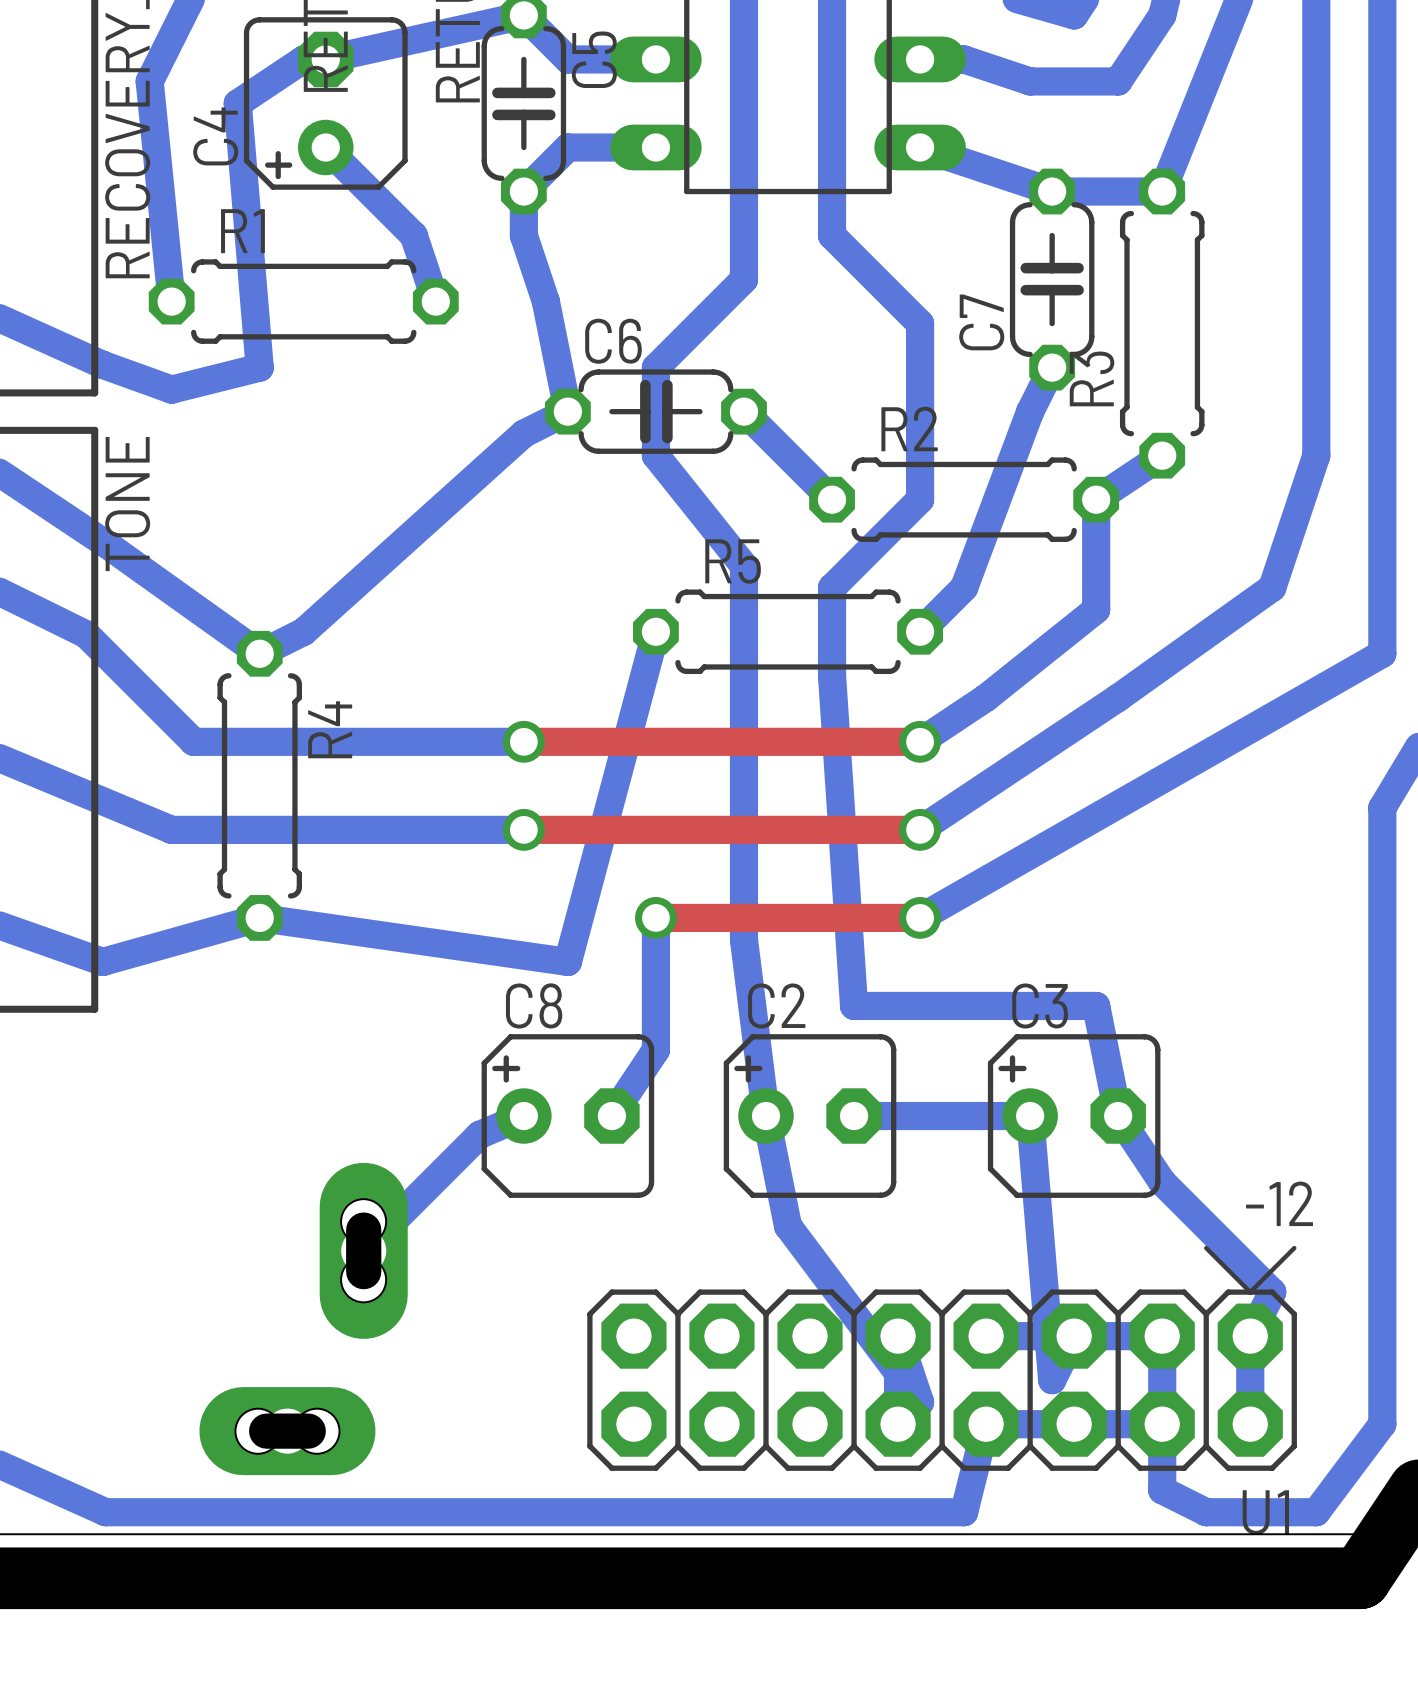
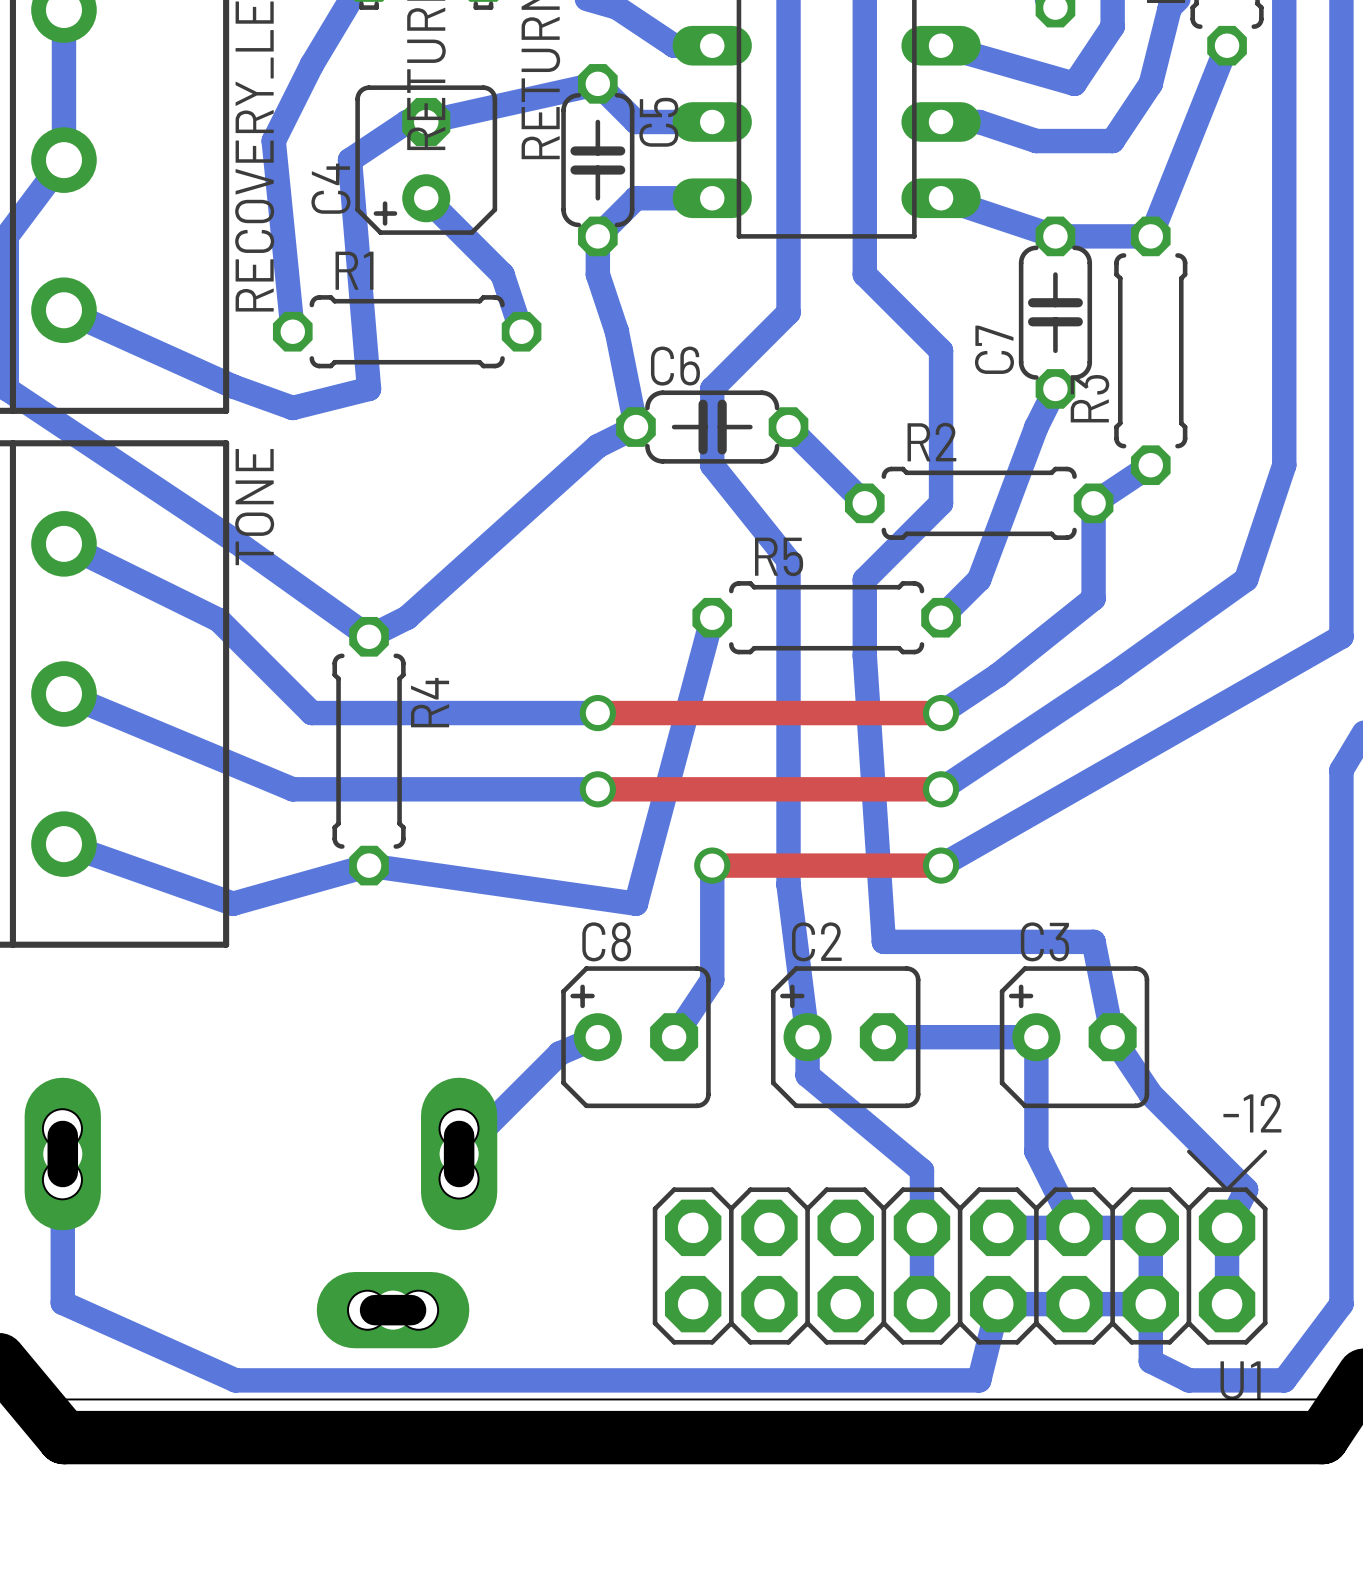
bottom track: (766, 1116) (788, 1226) (920, 1402) (898, 1336) -> (807, 1037) (807, 1075) (921, 1170) (921, 1227)
bottom track: (1030, 1116) (1052, 1380) (1074, 1336) -> (1036, 1037) (1036, 1151) (1074, 1227)

